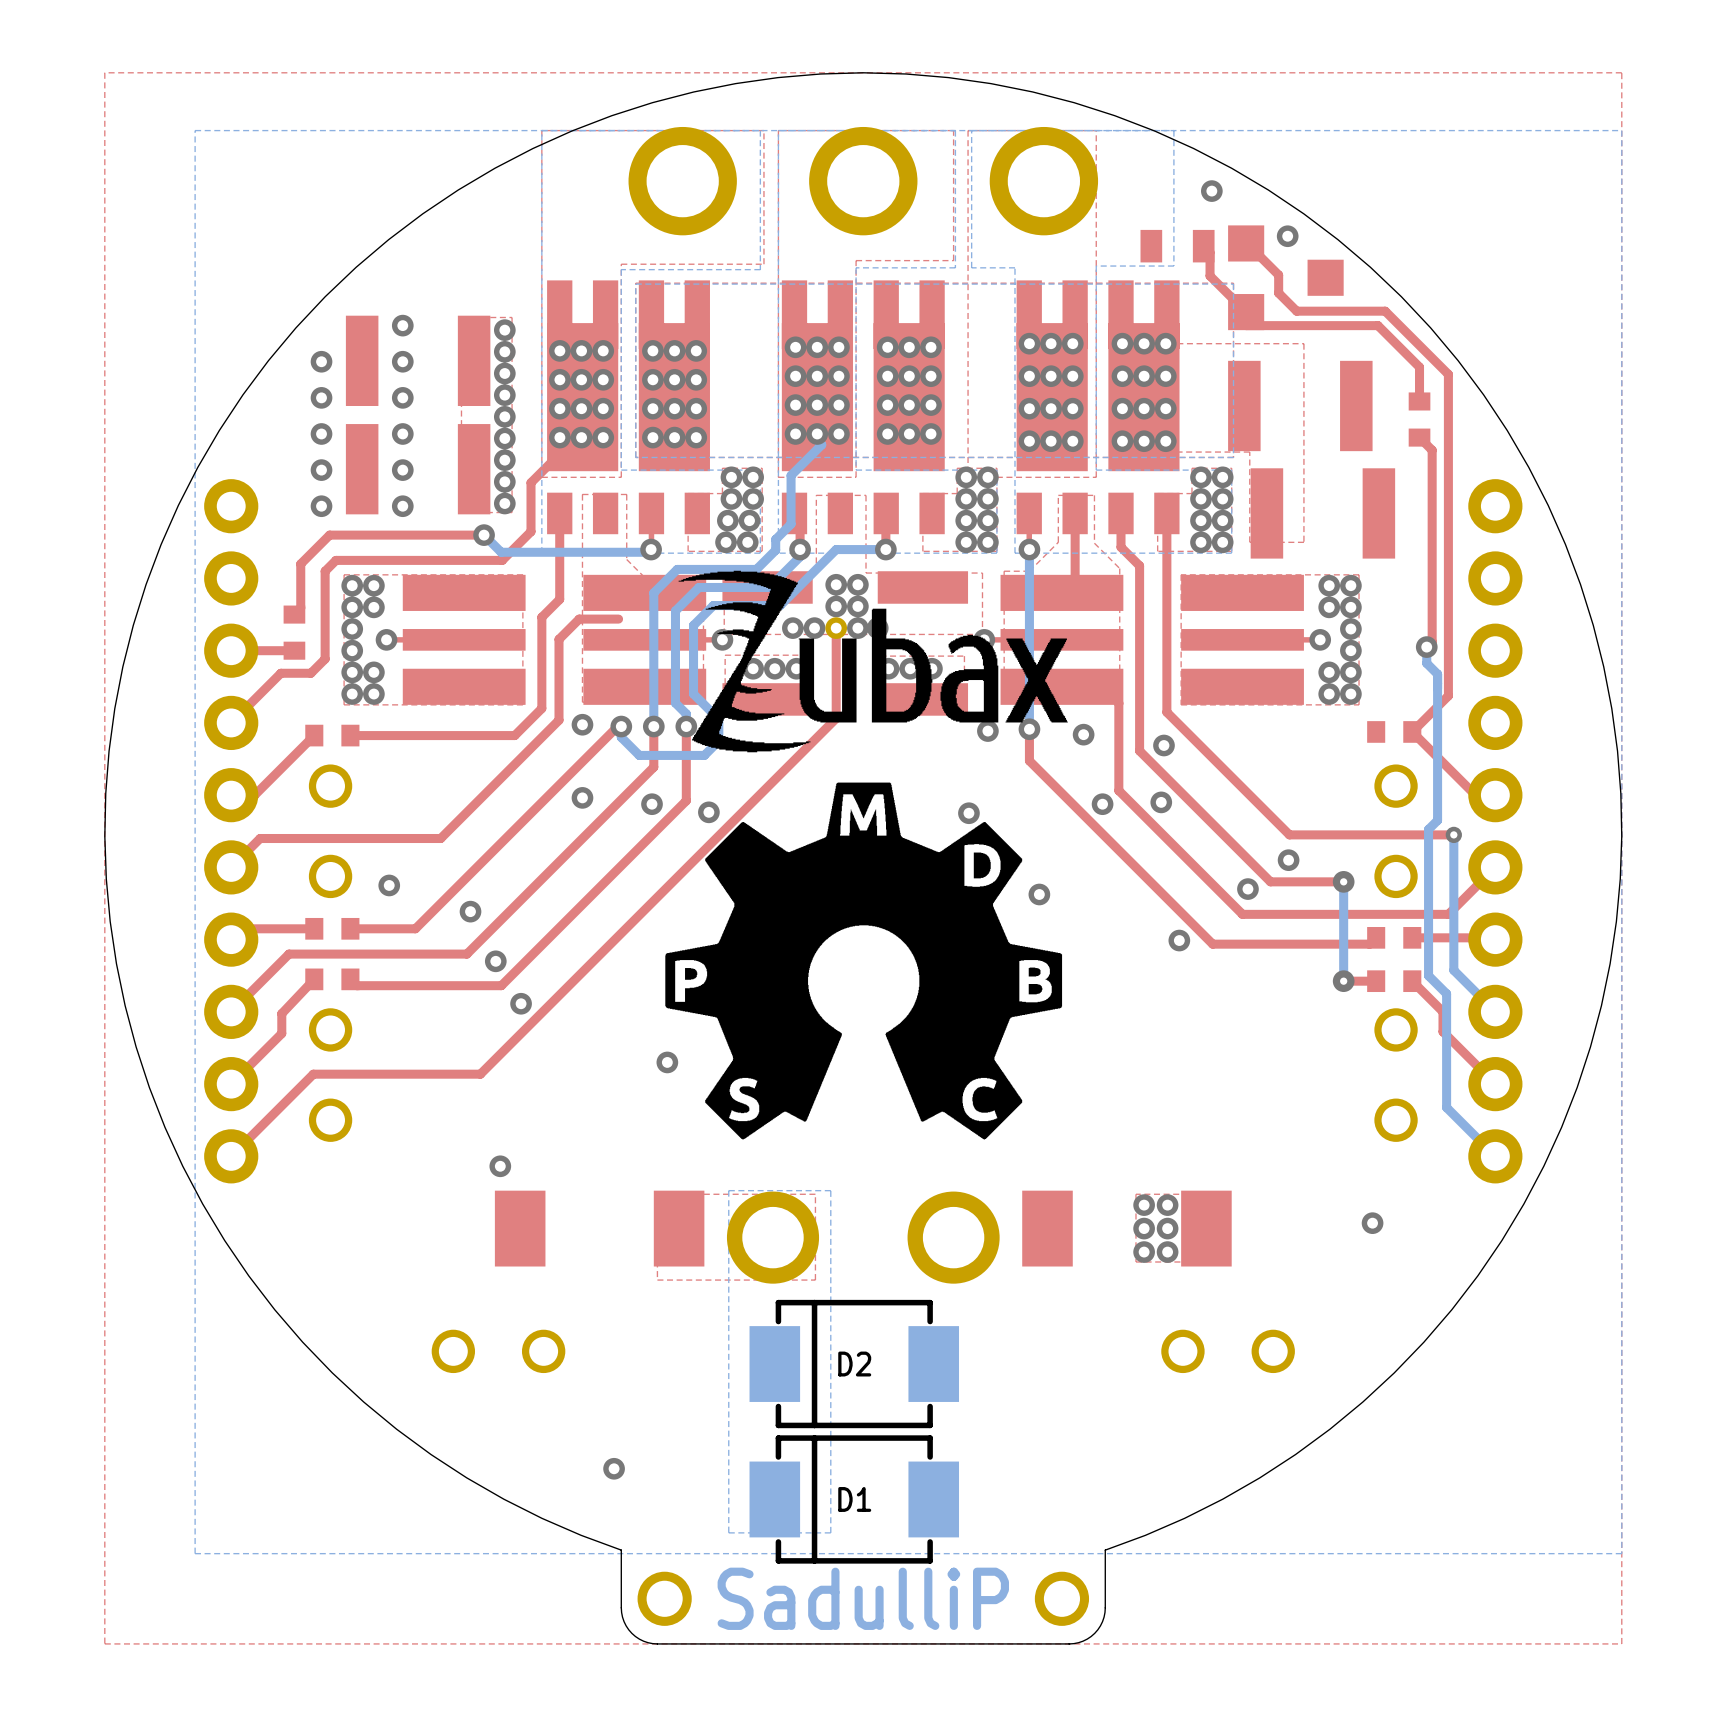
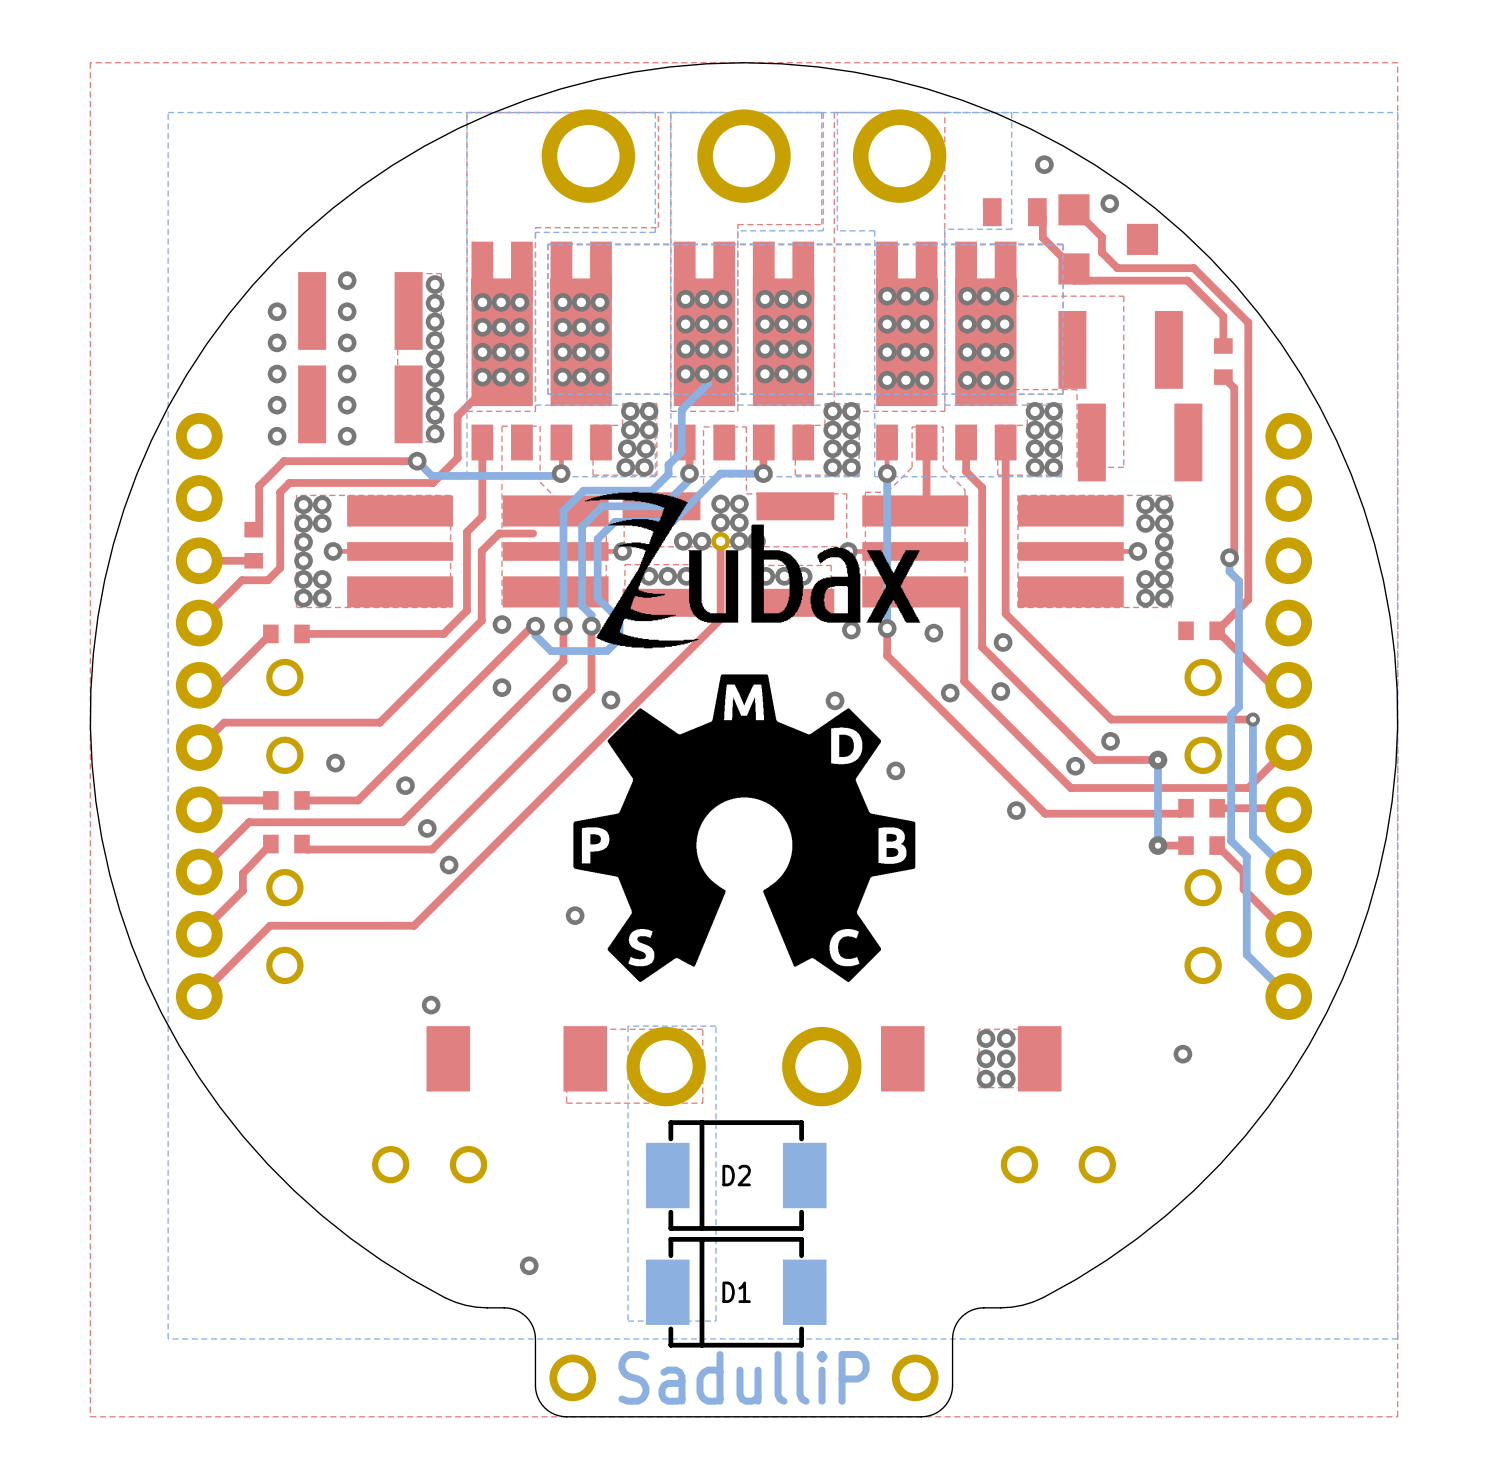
board edge: (1105, 1553) (1105, 1550) (1184, 1518) (1259, 1477) (1295, 1454) (1362, 1401) (1423, 1342) (1451, 1309) (1501, 1240) (1523, 1203) (1543, 1166) (1577, 1087) (1601, 1005) (1610, 963) (1620, 879) (1621, 836) (1617, 751) (1611, 708) (1603, 666) (1580, 584) (1548, 505) (1528, 467) (1483, 394) (1458, 360) (1401, 296) (1370, 267) (1303, 213) (1231, 168) (1154, 131) (1114, 115) (1032, 91) (990, 83) (948, 77) (863, 72) (778, 77) (735, 83) (693, 91) (611, 115) (571, 131) (494, 168) (422, 213) (356, 267) (325, 296) (268, 360) (242, 394) (197, 467) (178, 505) (146, 584) (122, 666) (114, 708) (109, 751) (104, 836) (106, 879) (116, 963) (125, 1005) (149, 1087) (182, 1166) (202, 1203) (224, 1240) (274, 1309) (302, 1342) (363, 1401) (431, 1454) (466, 1477) (542, 1518) (621, 1550) (621, 1553) -> (952, 1338) (956, 1323) (968, 1312) (979, 1308) (1022, 1305) (1043, 1297) (1107, 1259) (1166, 1215) (1194, 1190) (1244, 1136) (1289, 1077) (1308, 1045) (1326, 1013) (1356, 945) (1378, 874) (1386, 838) (1395, 764) (1397, 727) (1394, 653) (1390, 616) (1374, 544) (1351, 474) (1336, 440) (1301, 374) (1281, 343) (1235, 285) (1210, 258) (1155, 208) (1125, 185) (1063, 146) (1030, 128) (962, 100) (926, 88) (854, 72) (817, 66) (744, 62) (670, 66) (633, 72) (561, 88) (525, 100) (457, 128) (424, 146) (362, 185) (332, 208) (277, 258) (252, 285) (206, 343) (186, 374) (151, 440) (136, 474) (113, 544) (97, 616) (93, 653) (90, 727) (92, 764) (101, 838) (109, 874) (131, 945) (161, 1013) (179, 1045) (198, 1077) (243, 1136) (293, 1190) (321, 1215) (380, 1259) (444, 1297) (465, 1305) (508, 1308) (519, 1312) (531, 1323) (535, 1338)

